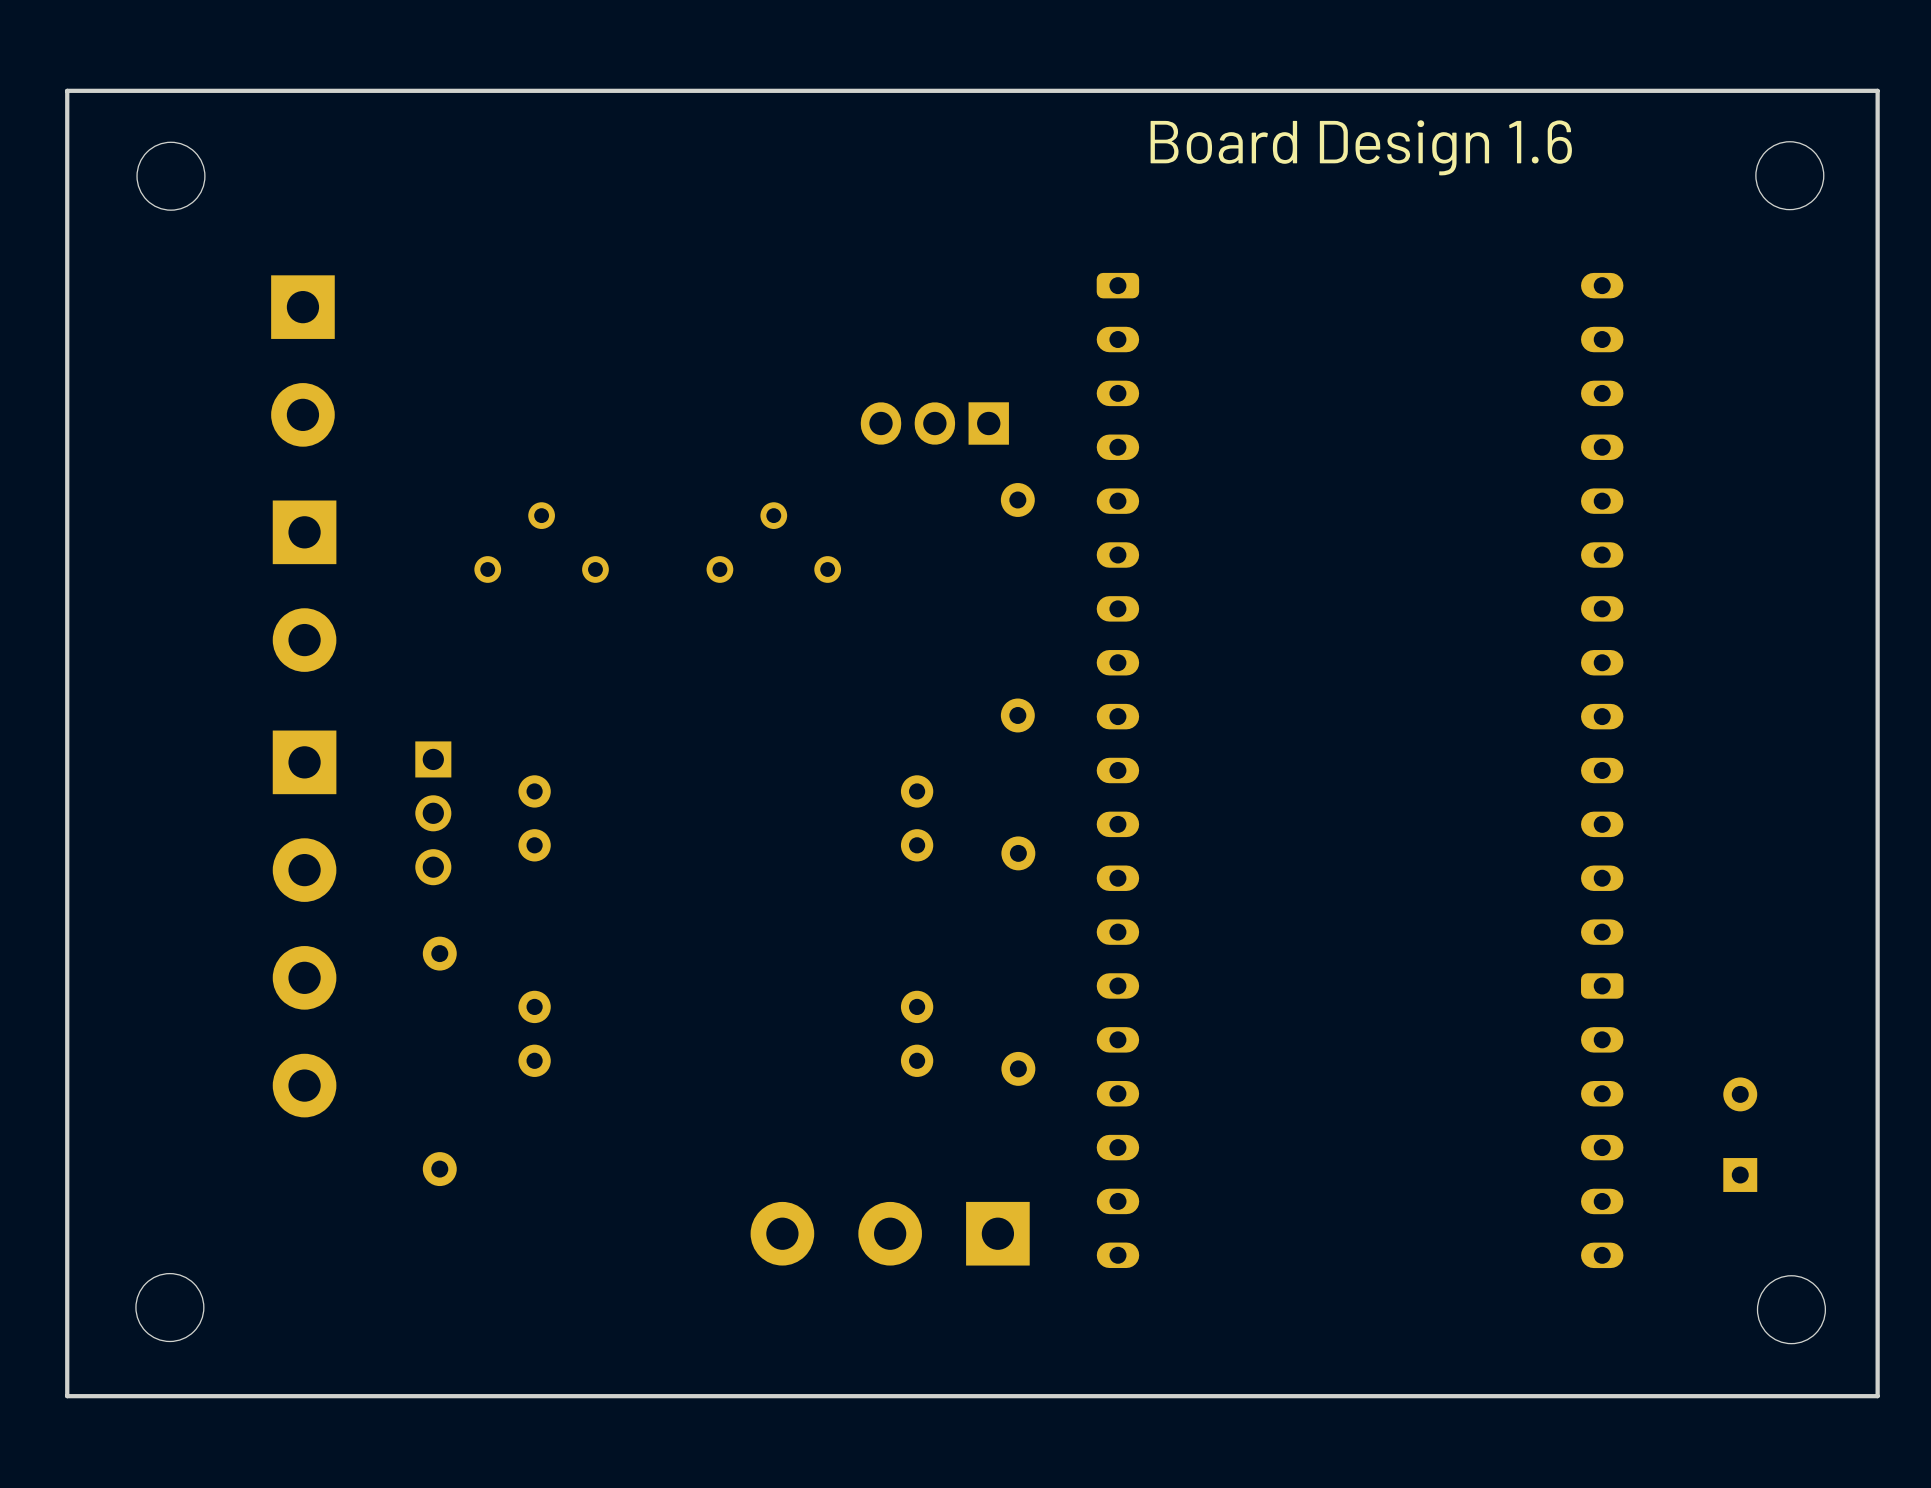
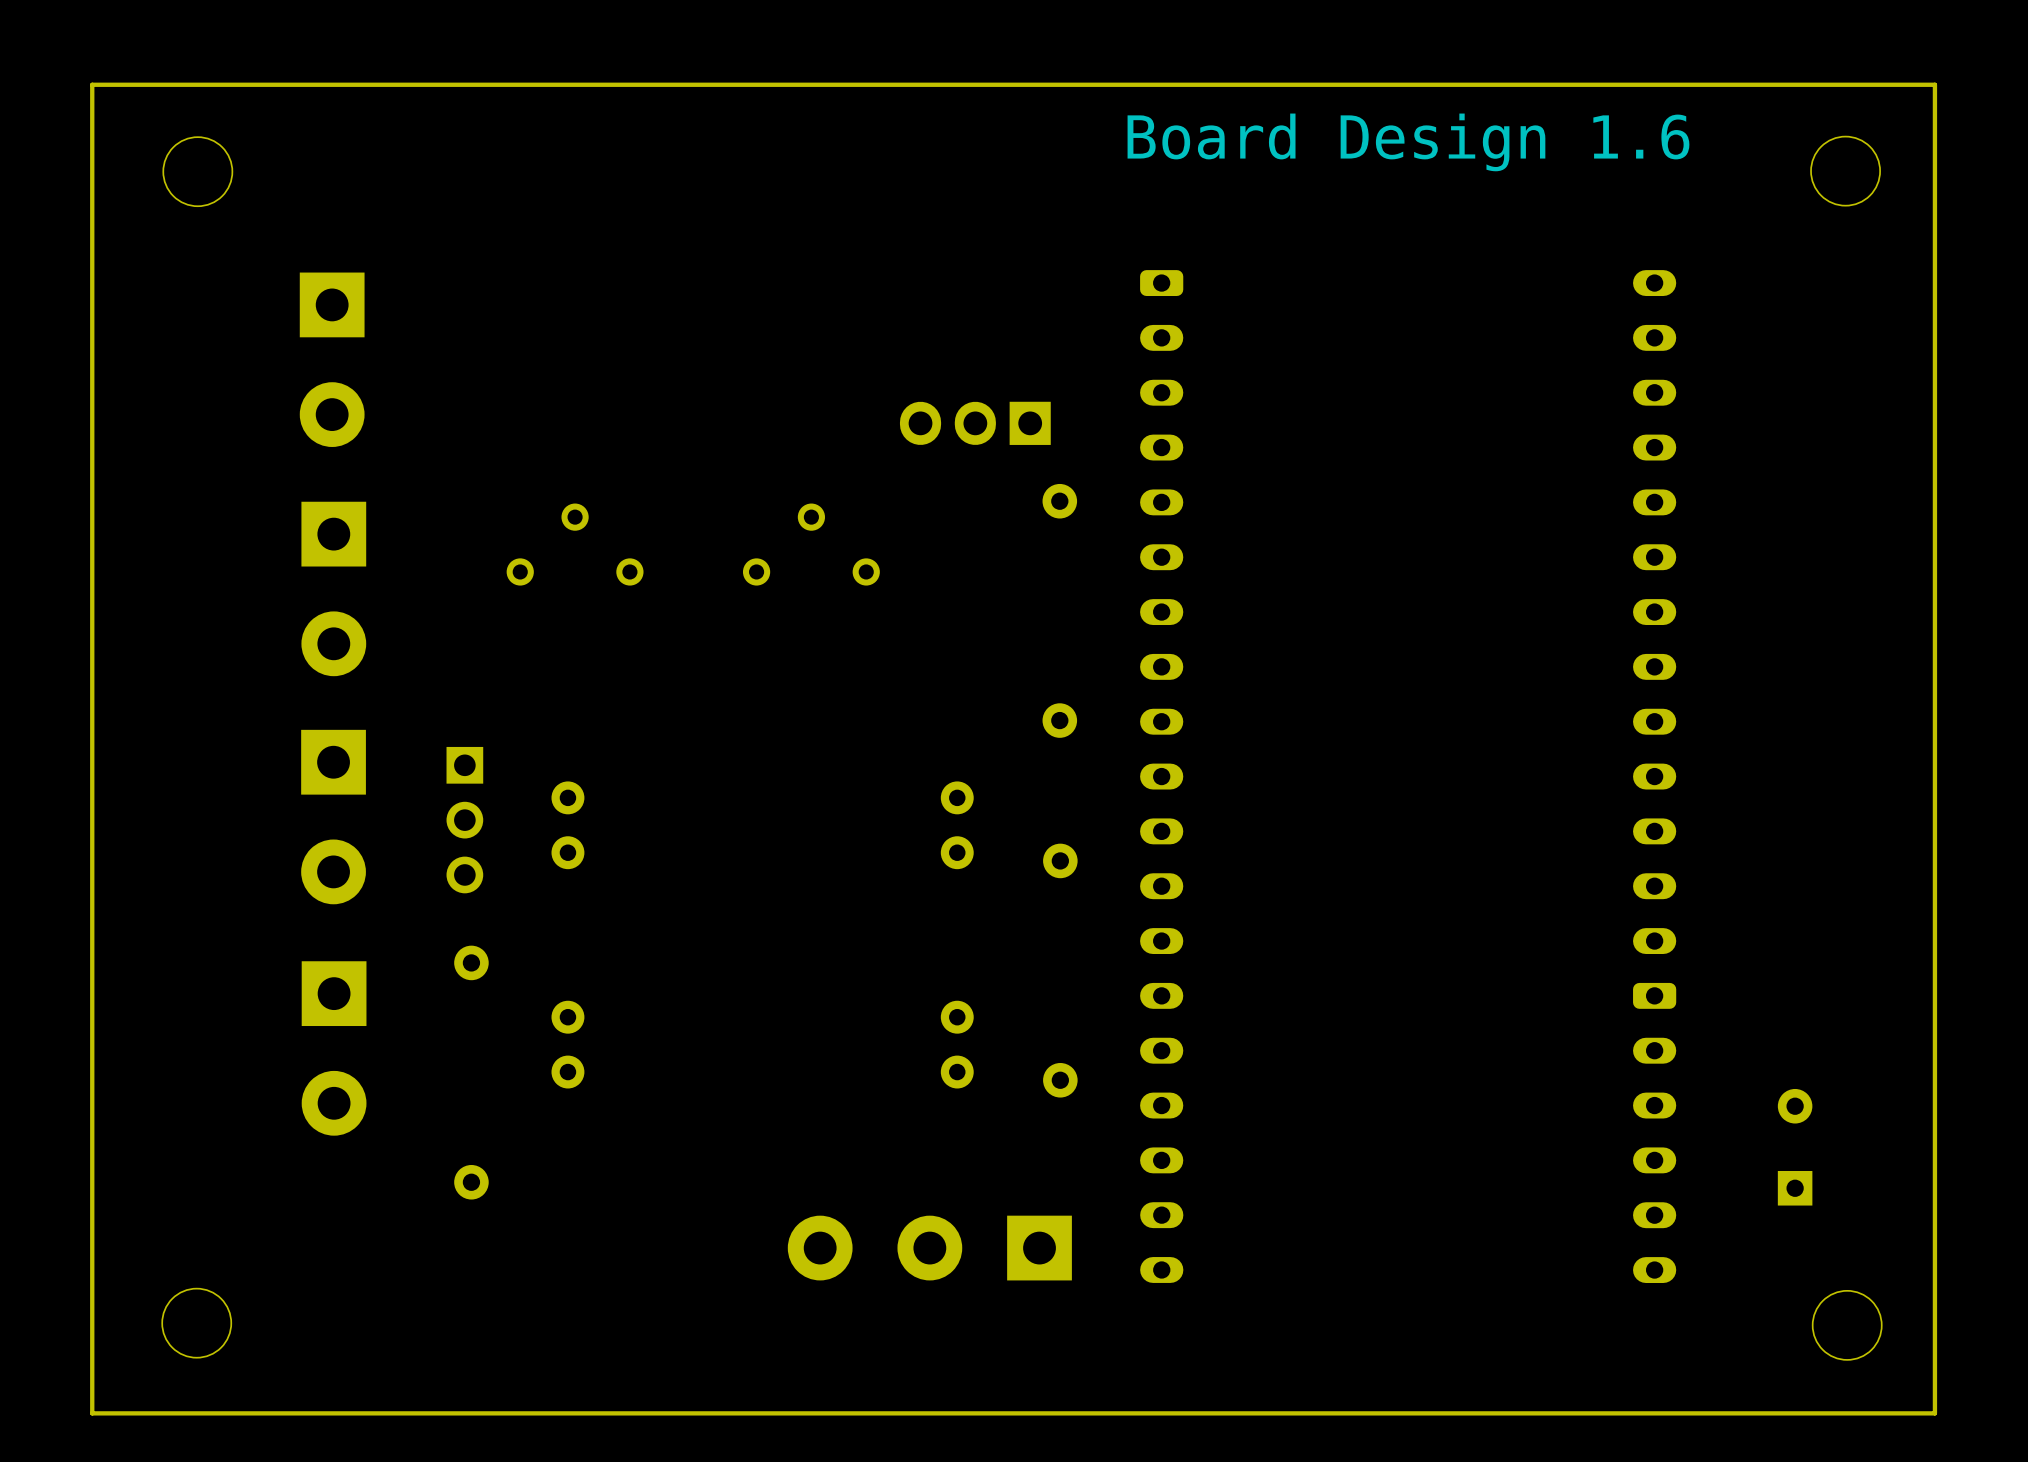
part: none -> (333, 817)
part: (304, 923) -> none
part: none -> (334, 1048)

